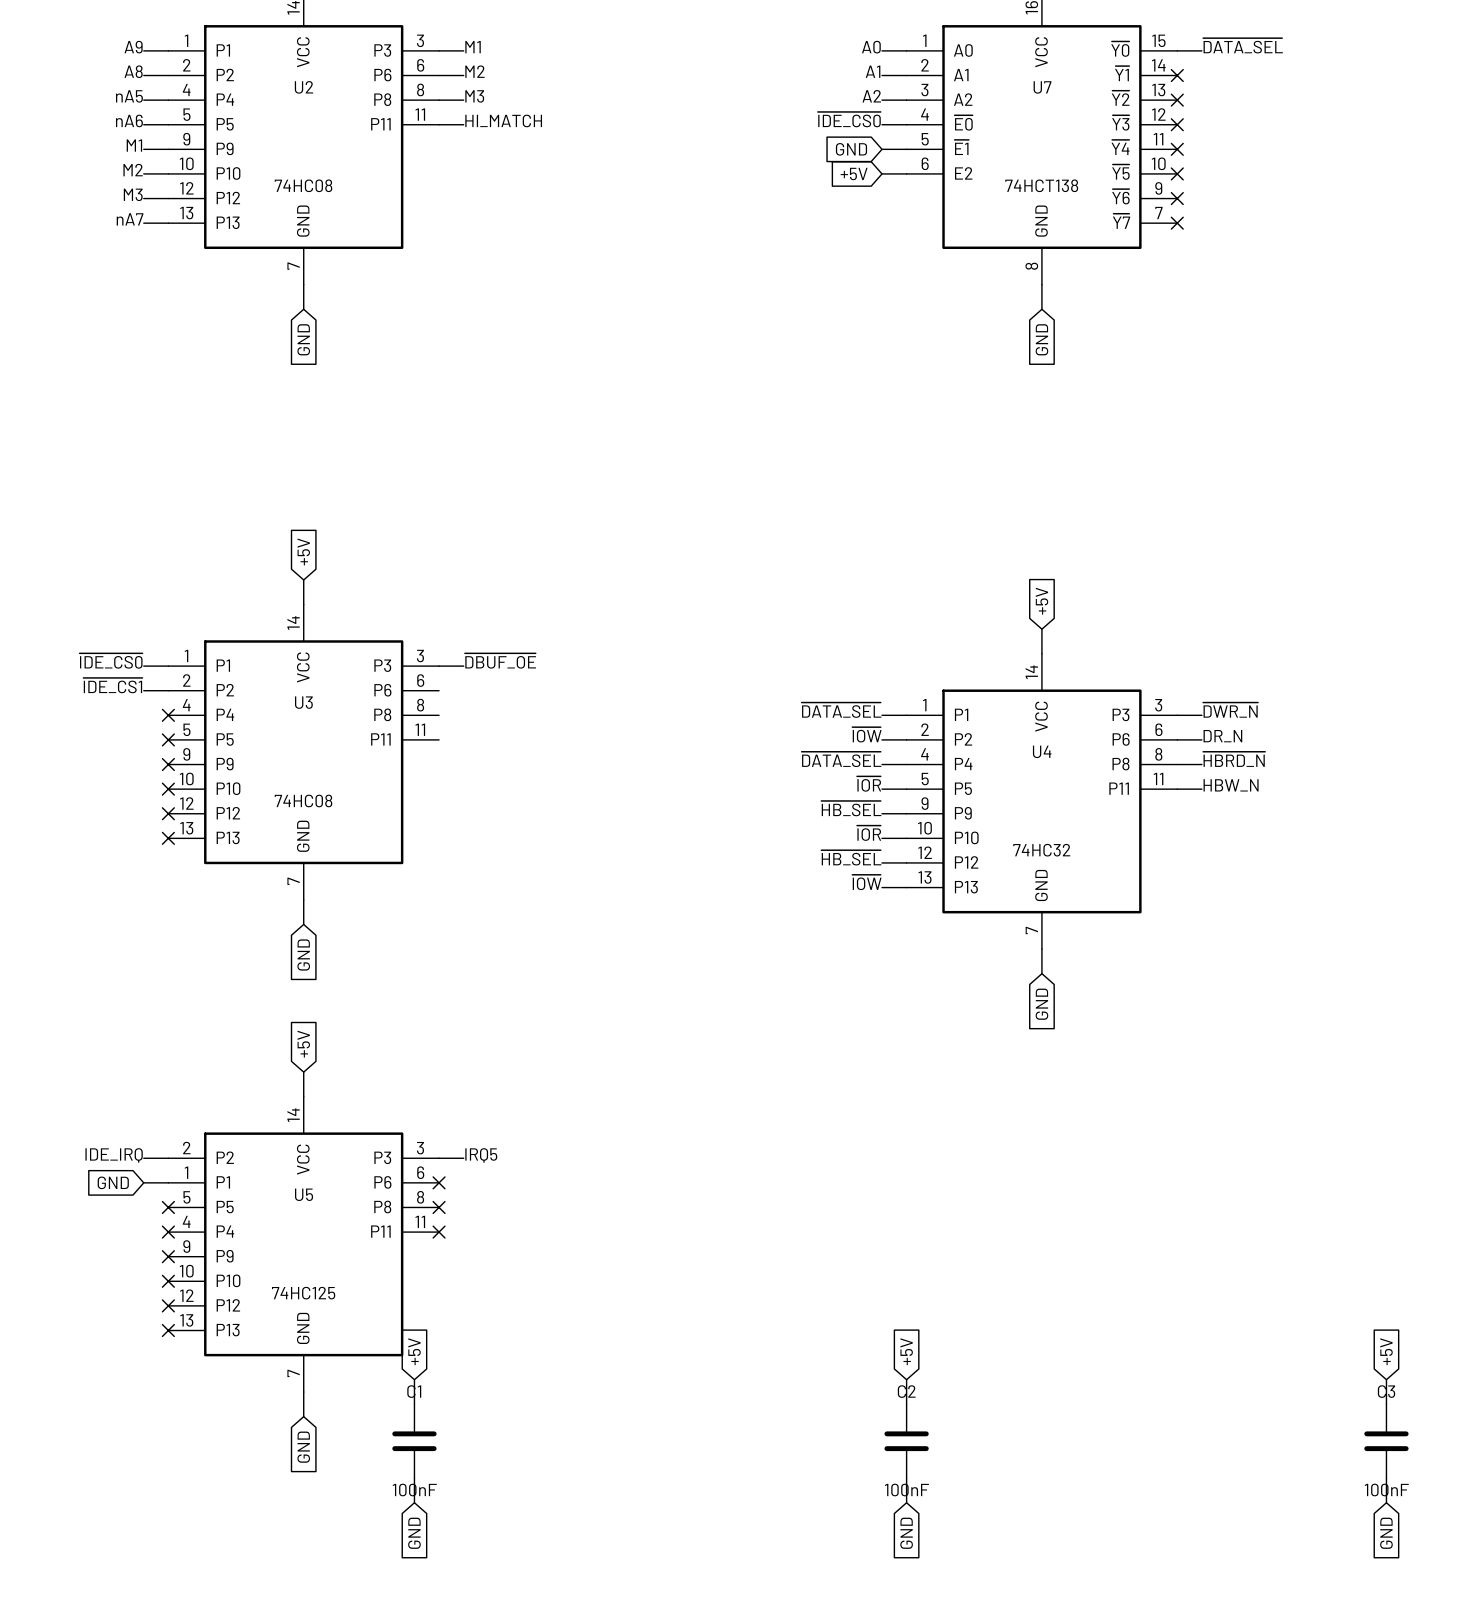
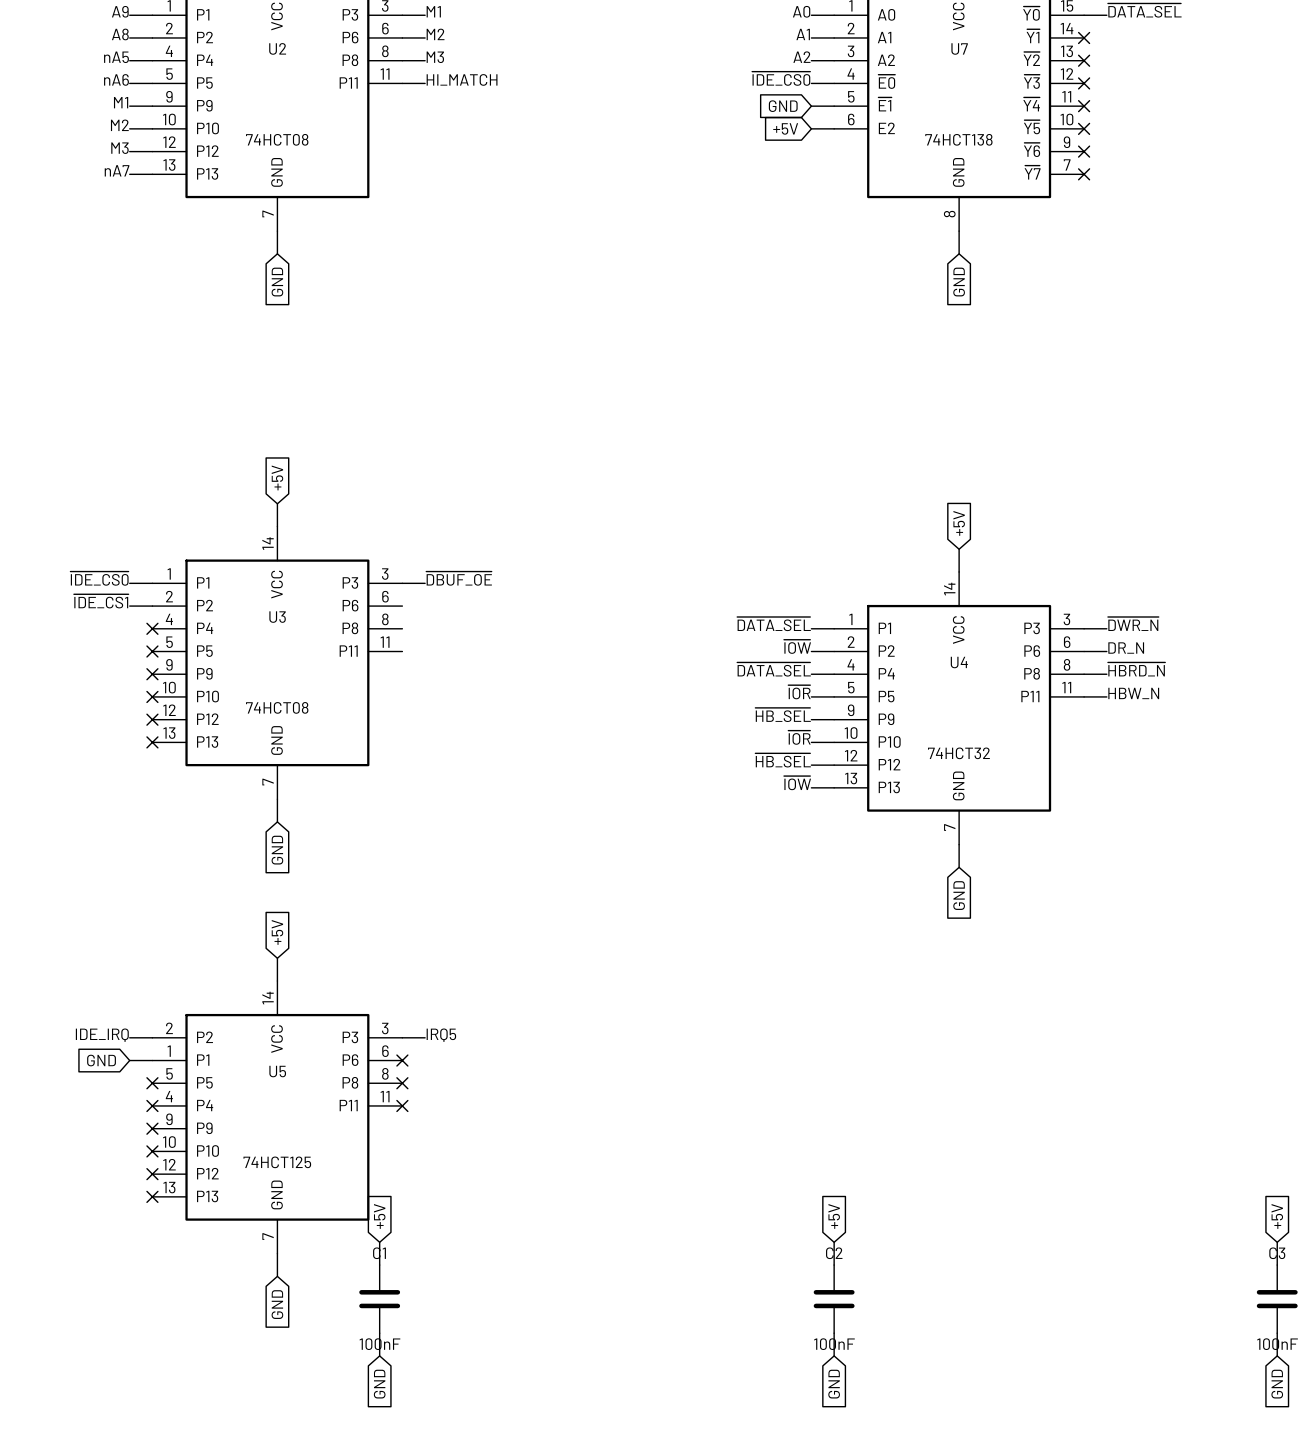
U2 value: 74HC08 (303, 185) -> 74HCT08 (277, 139)
U3 value: 74HC08 (303, 800) -> 74HCT08 (277, 707)
U4 value: 74HC32 (1041, 850) -> 74HCT32 (958, 753)
U5 value: 74HC125 (303, 1293) -> 74HCT125 (277, 1162)

